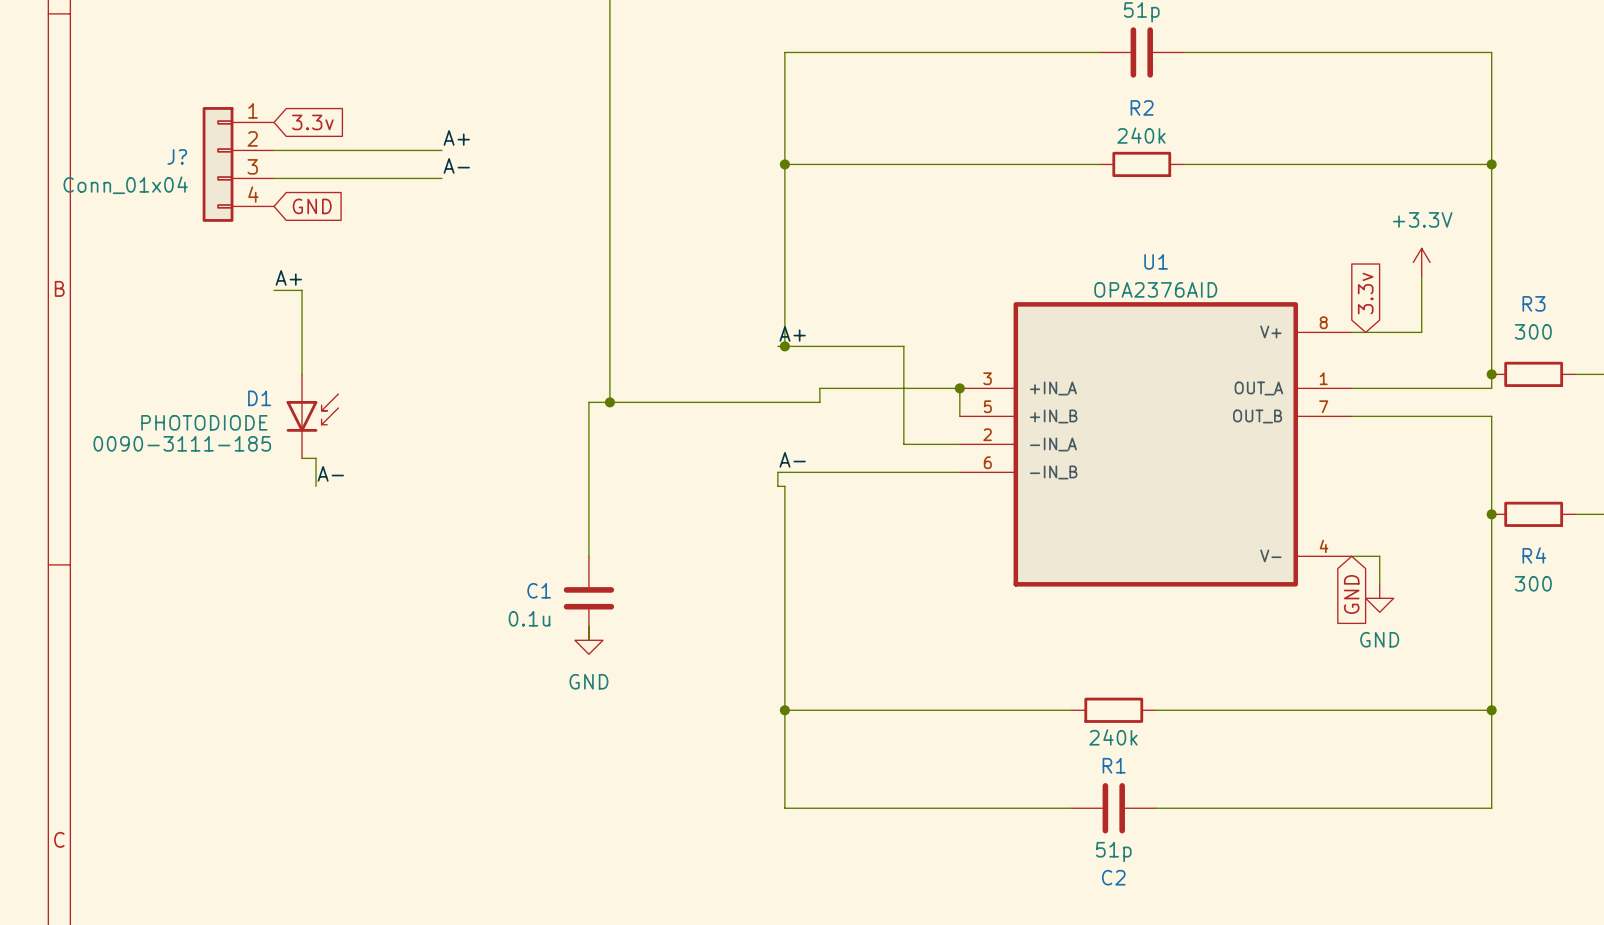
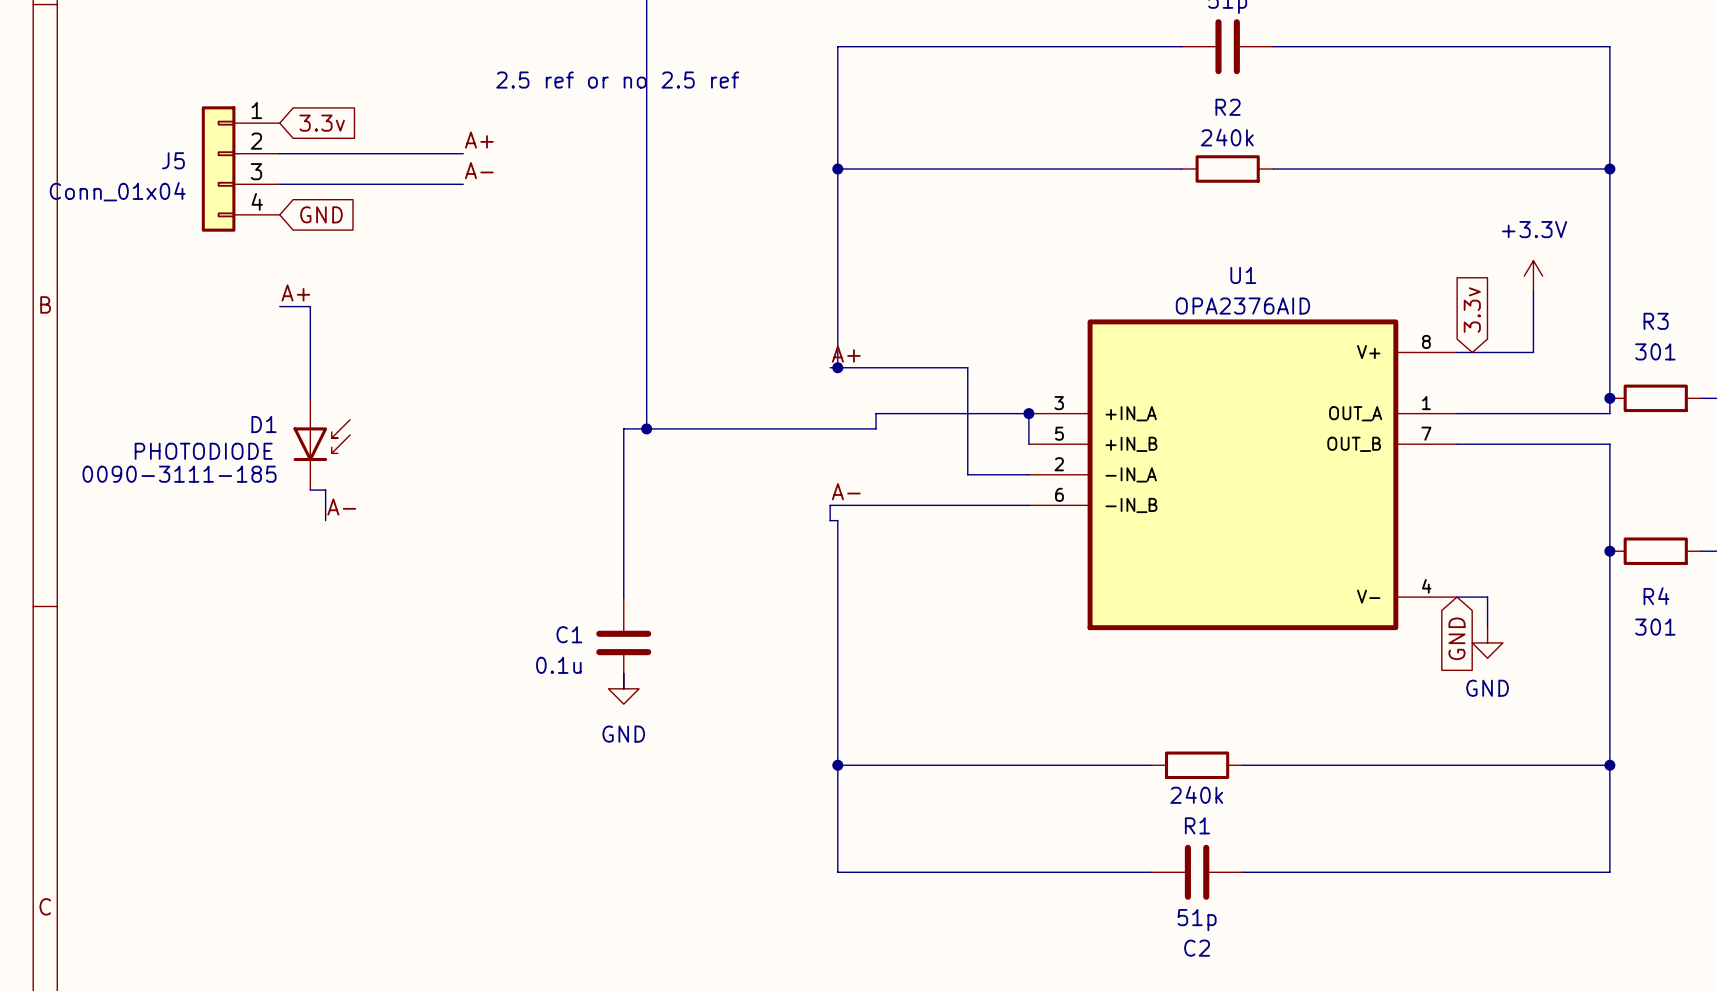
text: none -> 2.5 ref or no 2.5 ref (617, 80)
J? name: J? (177, 156) -> J5 (173, 160)
R3 value: 300 (1533, 331) -> 301 (1655, 351)
R4 value: 300 (1533, 583) -> 301 (1655, 627)

